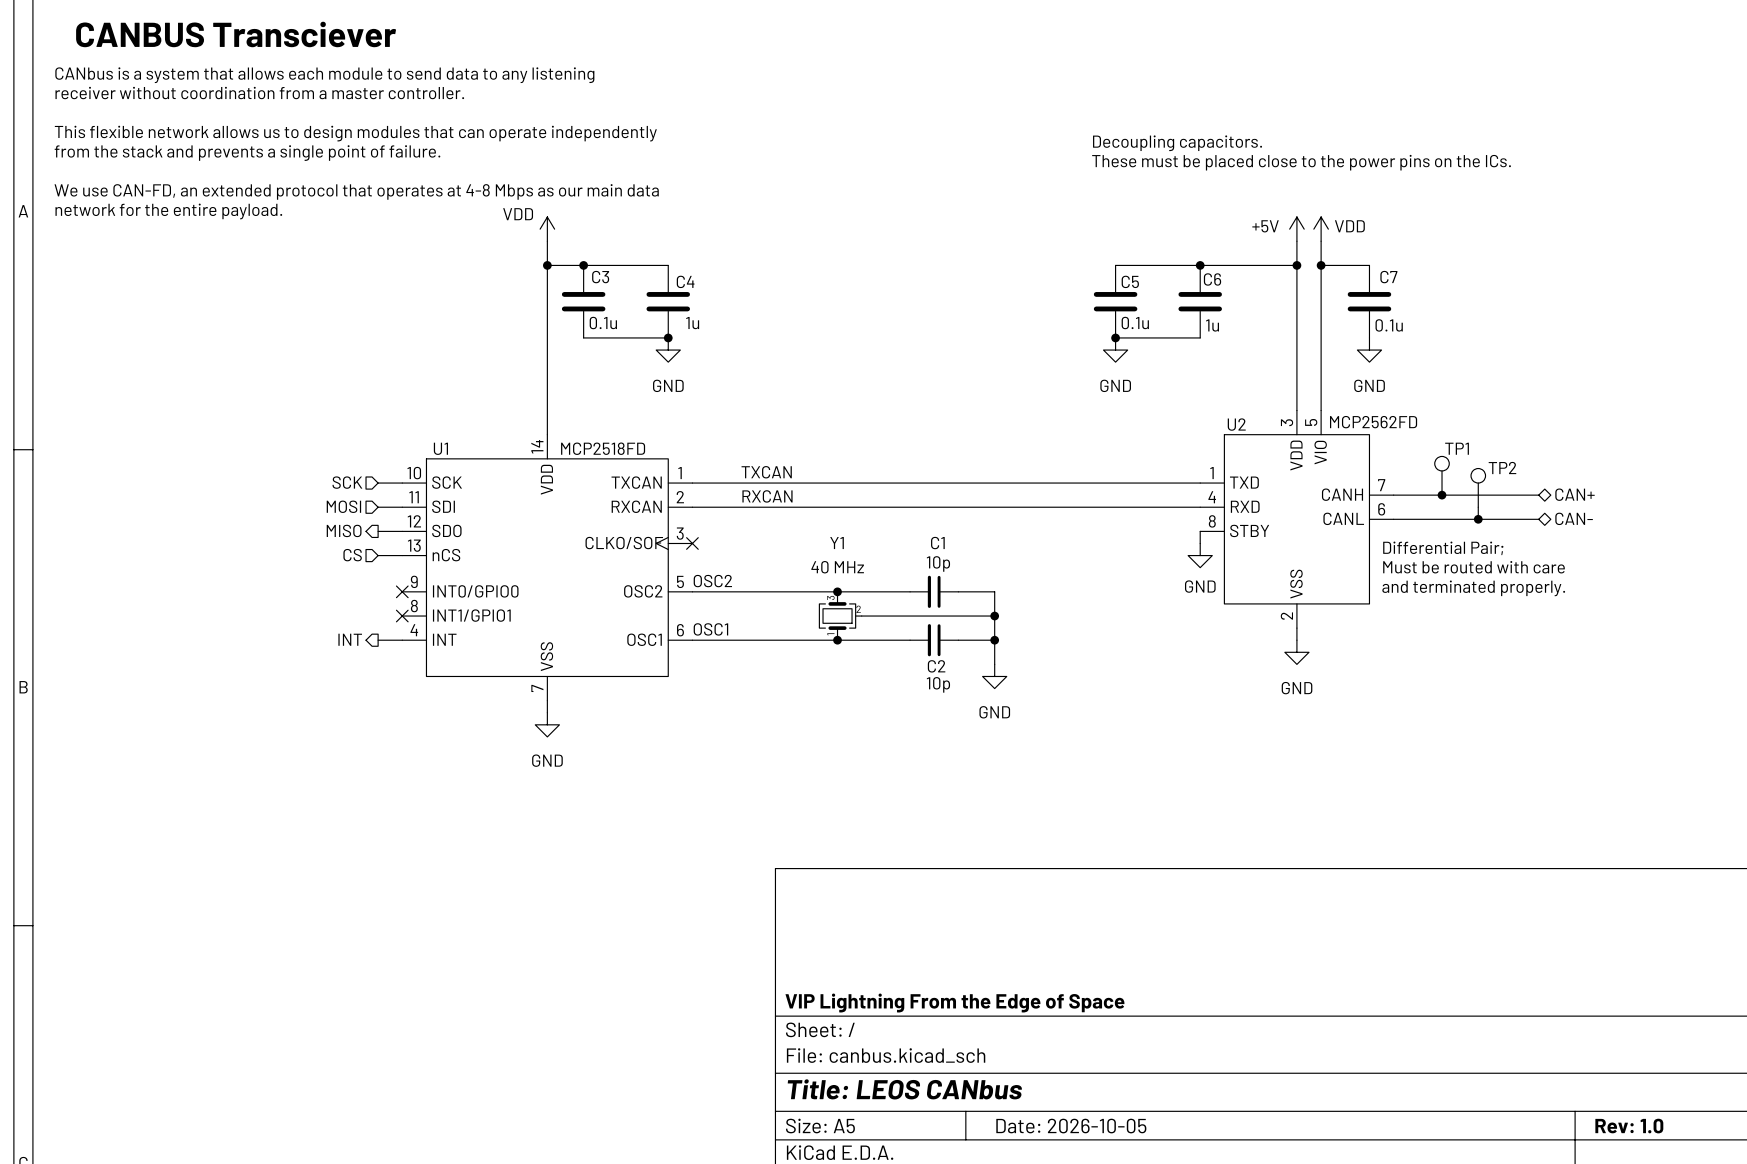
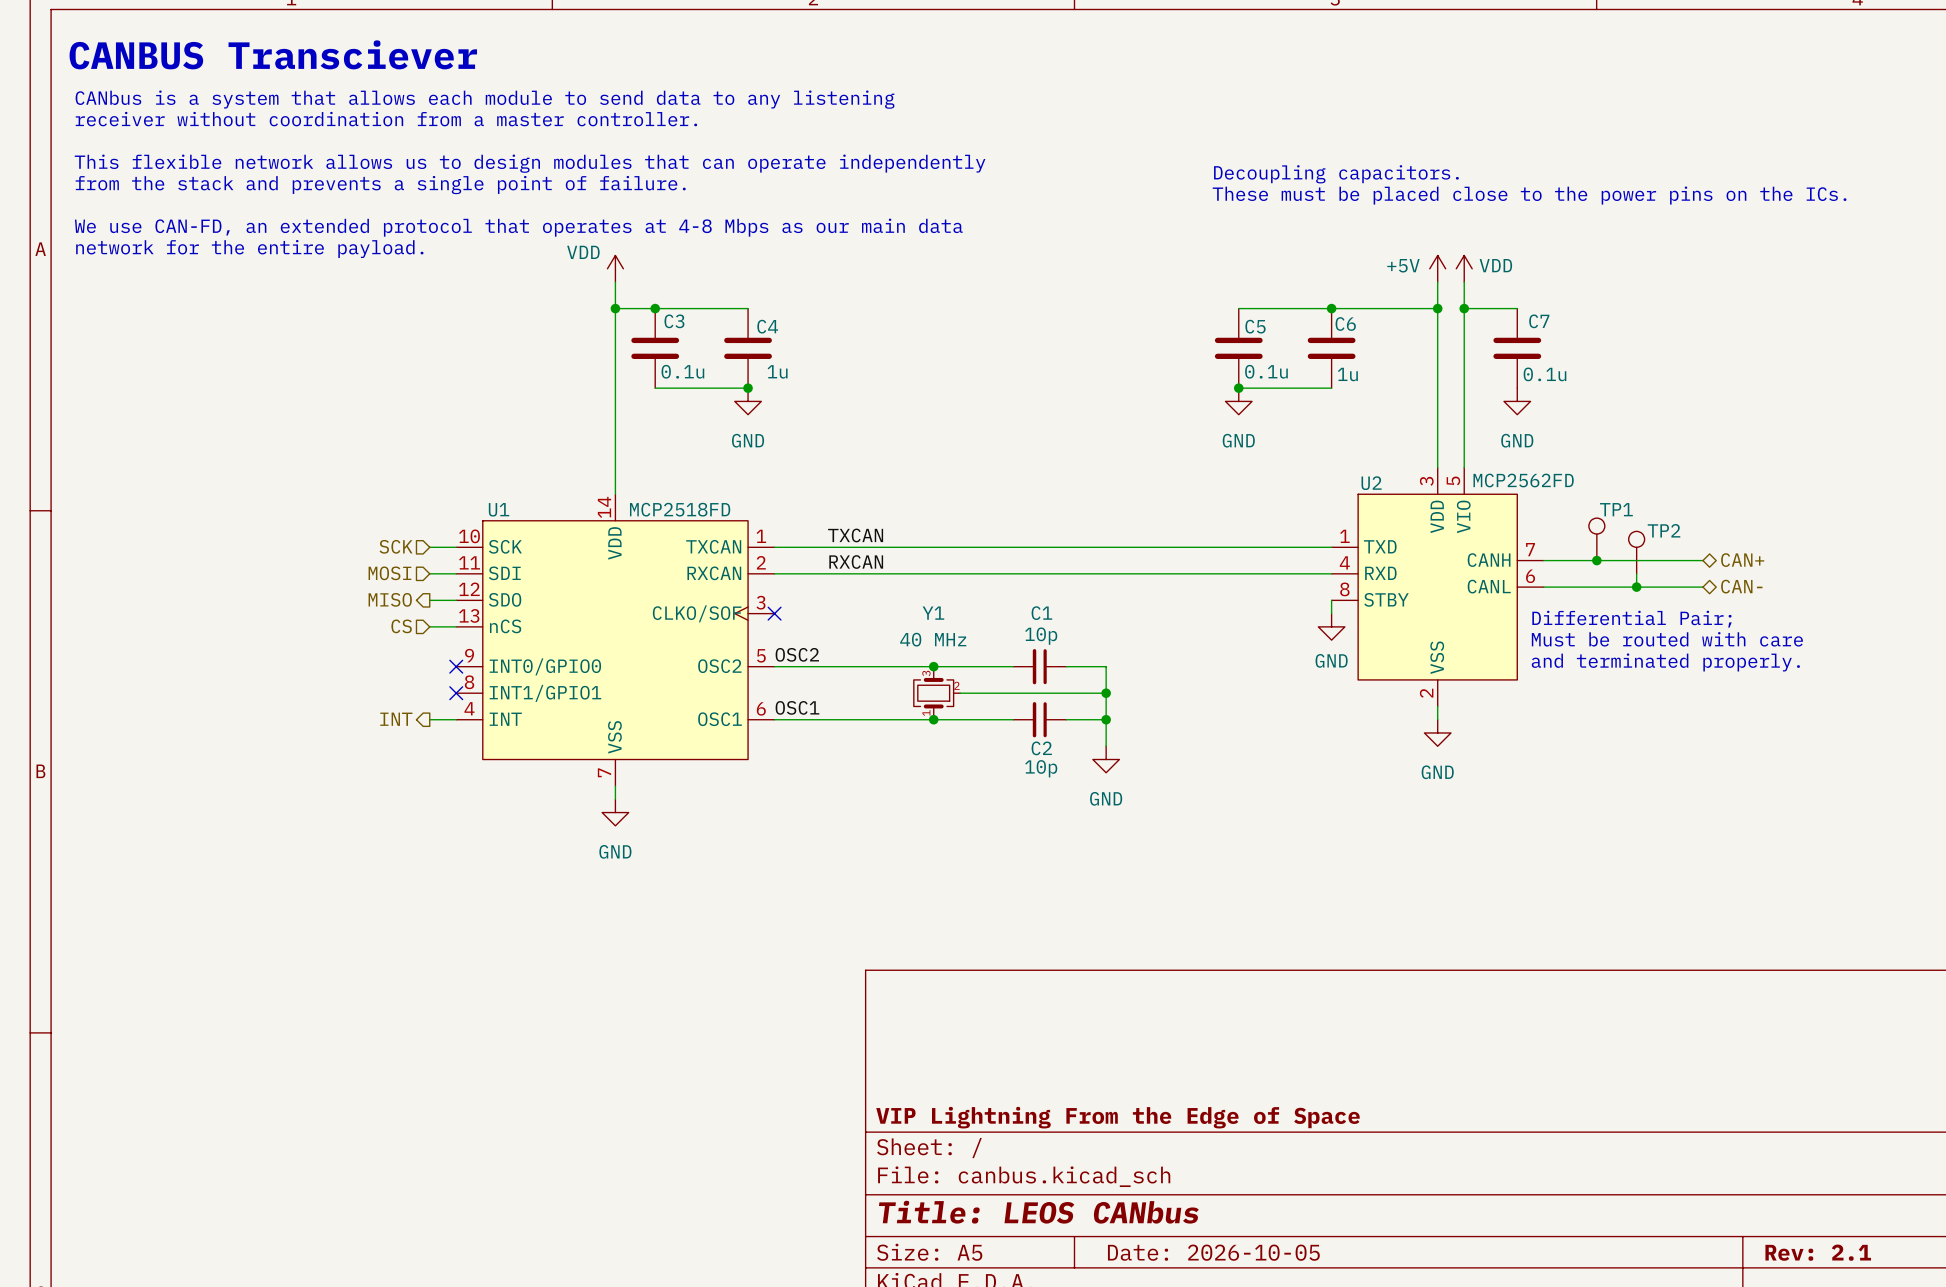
title block: Rev: 1.0 (1629, 1126) -> Rev: 2.1 (1818, 1252)

